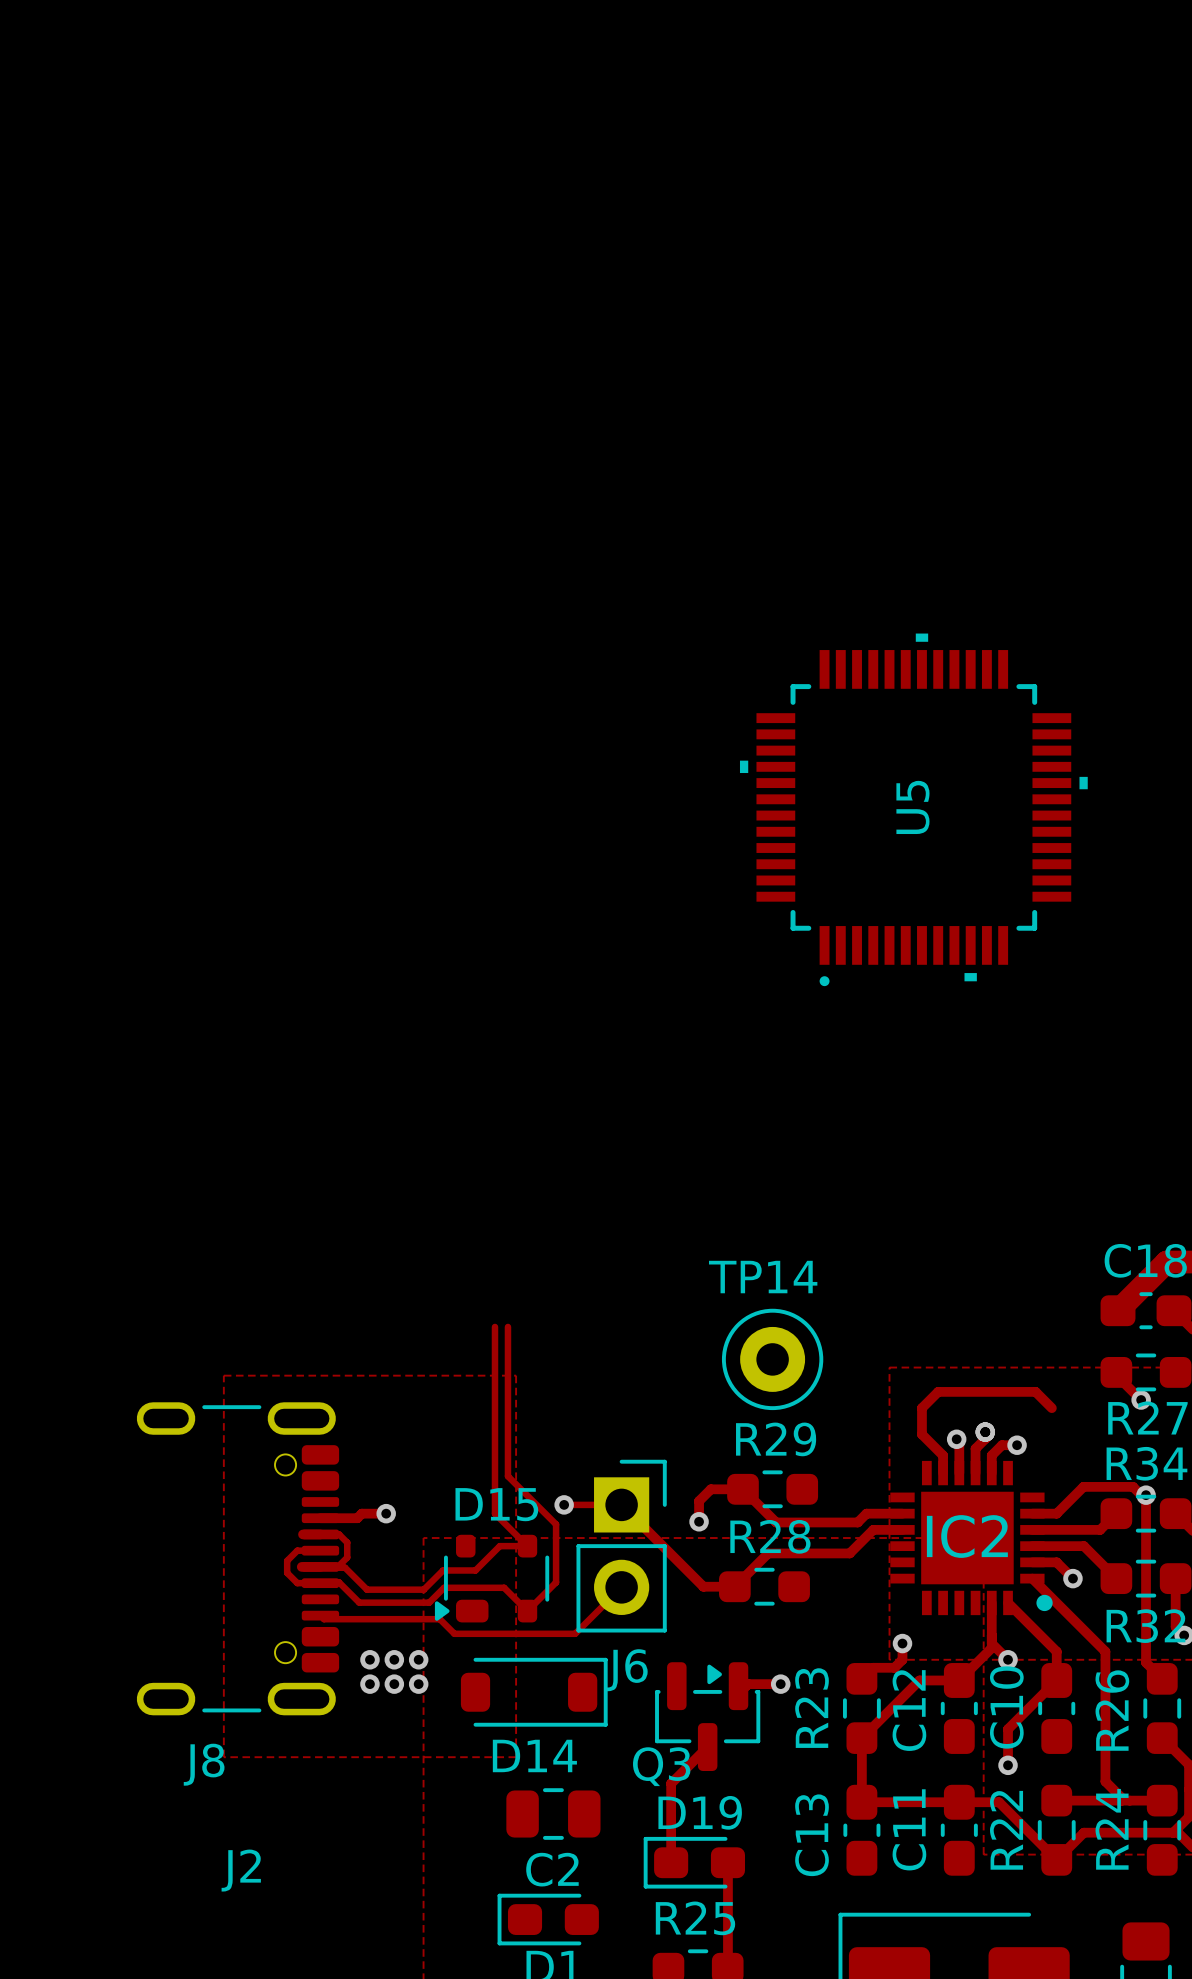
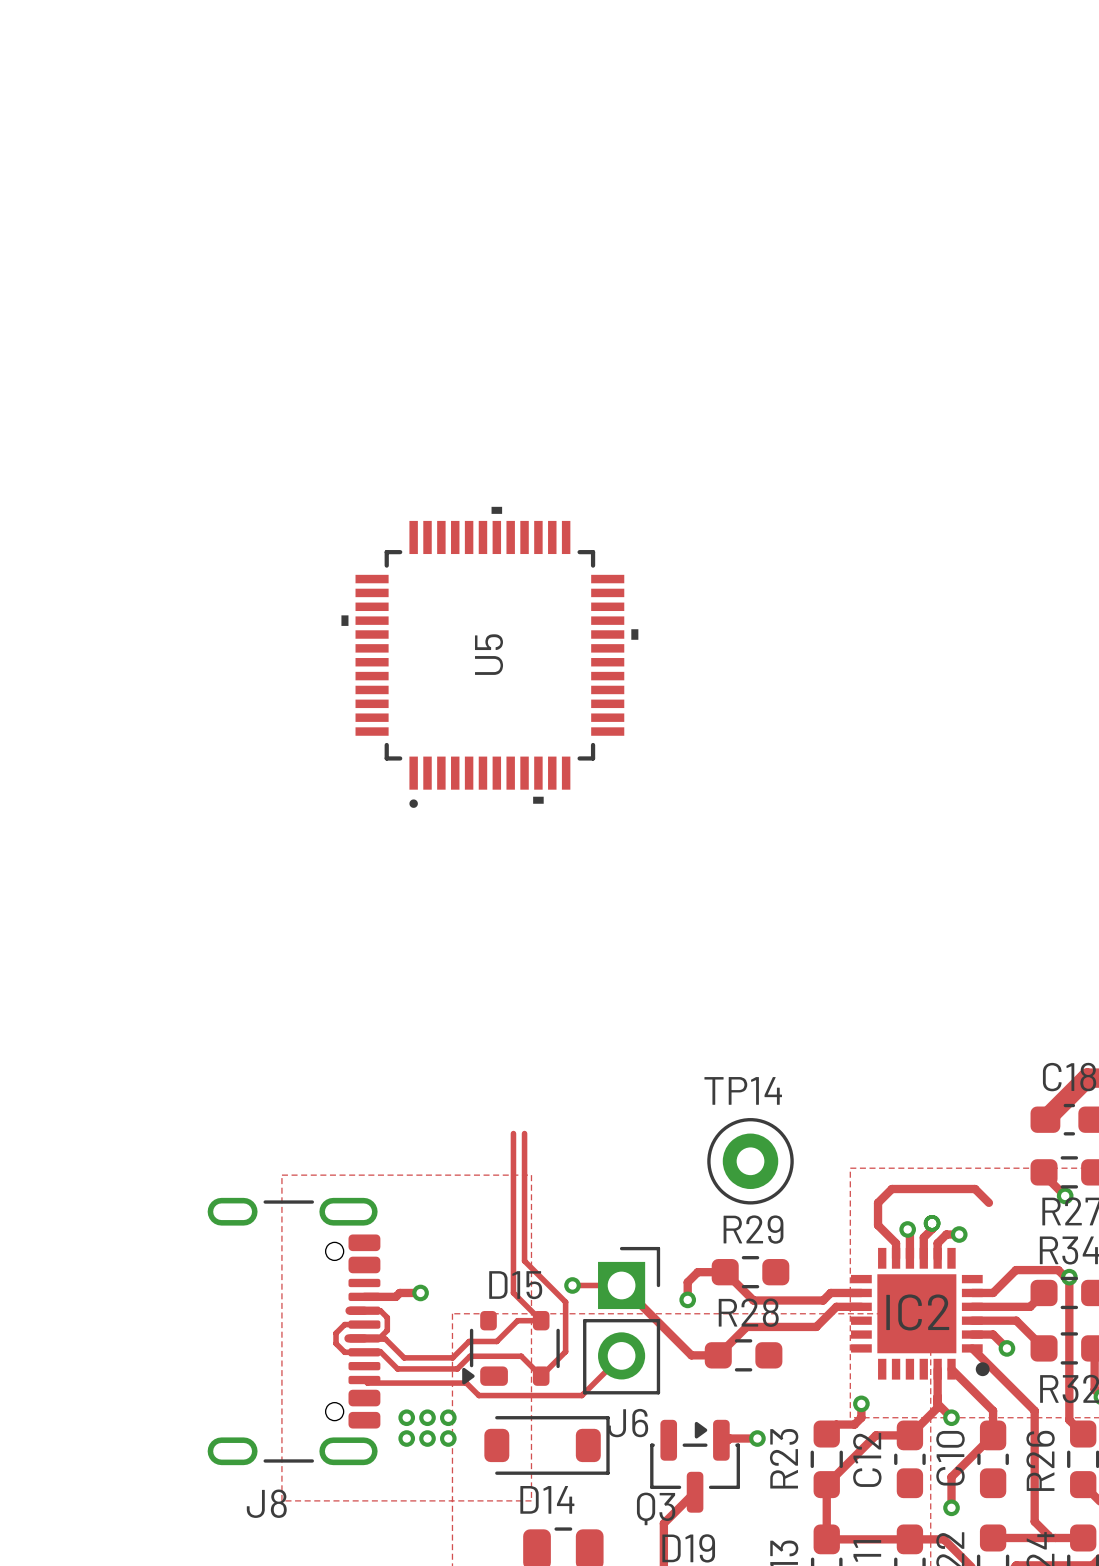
U5 position: (913, 809) -> (489, 657)

